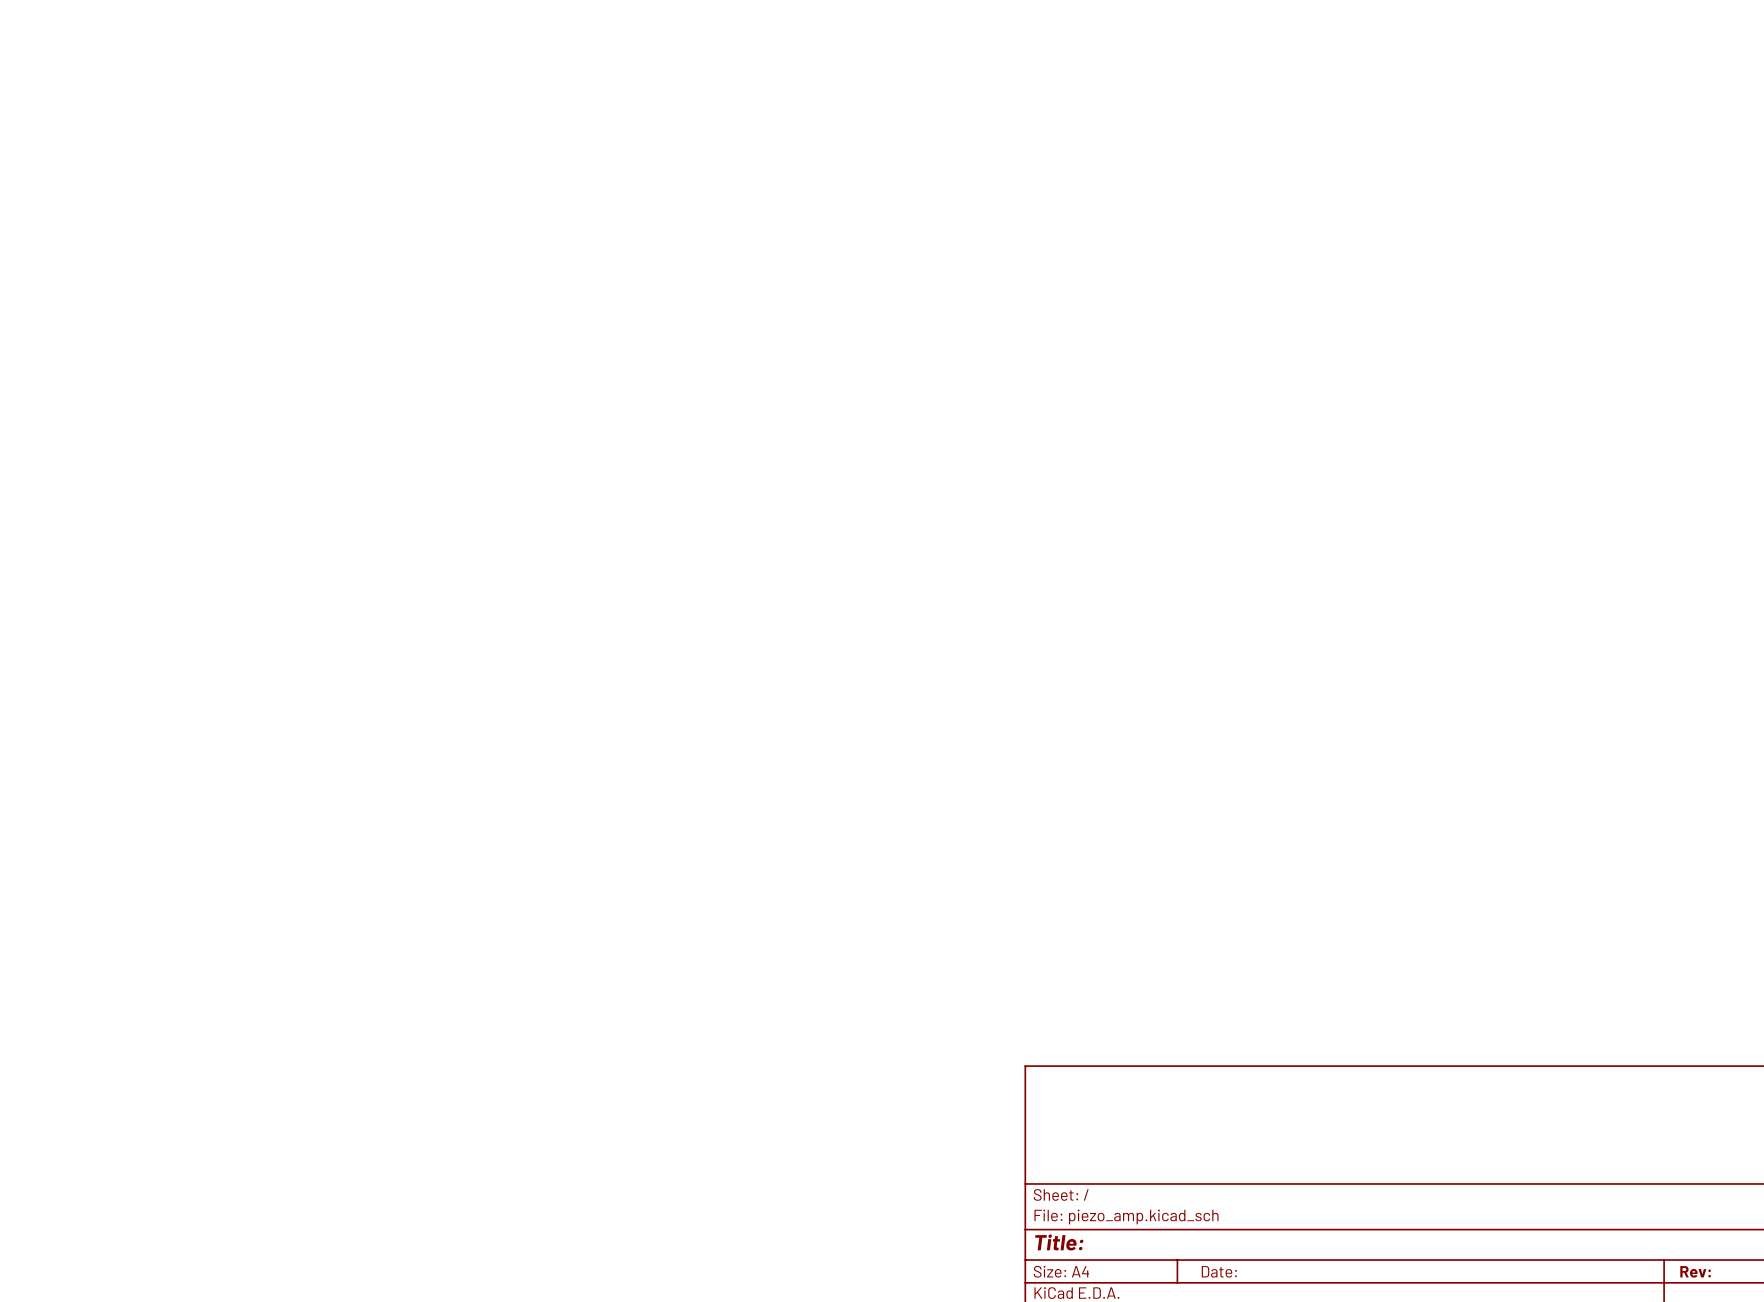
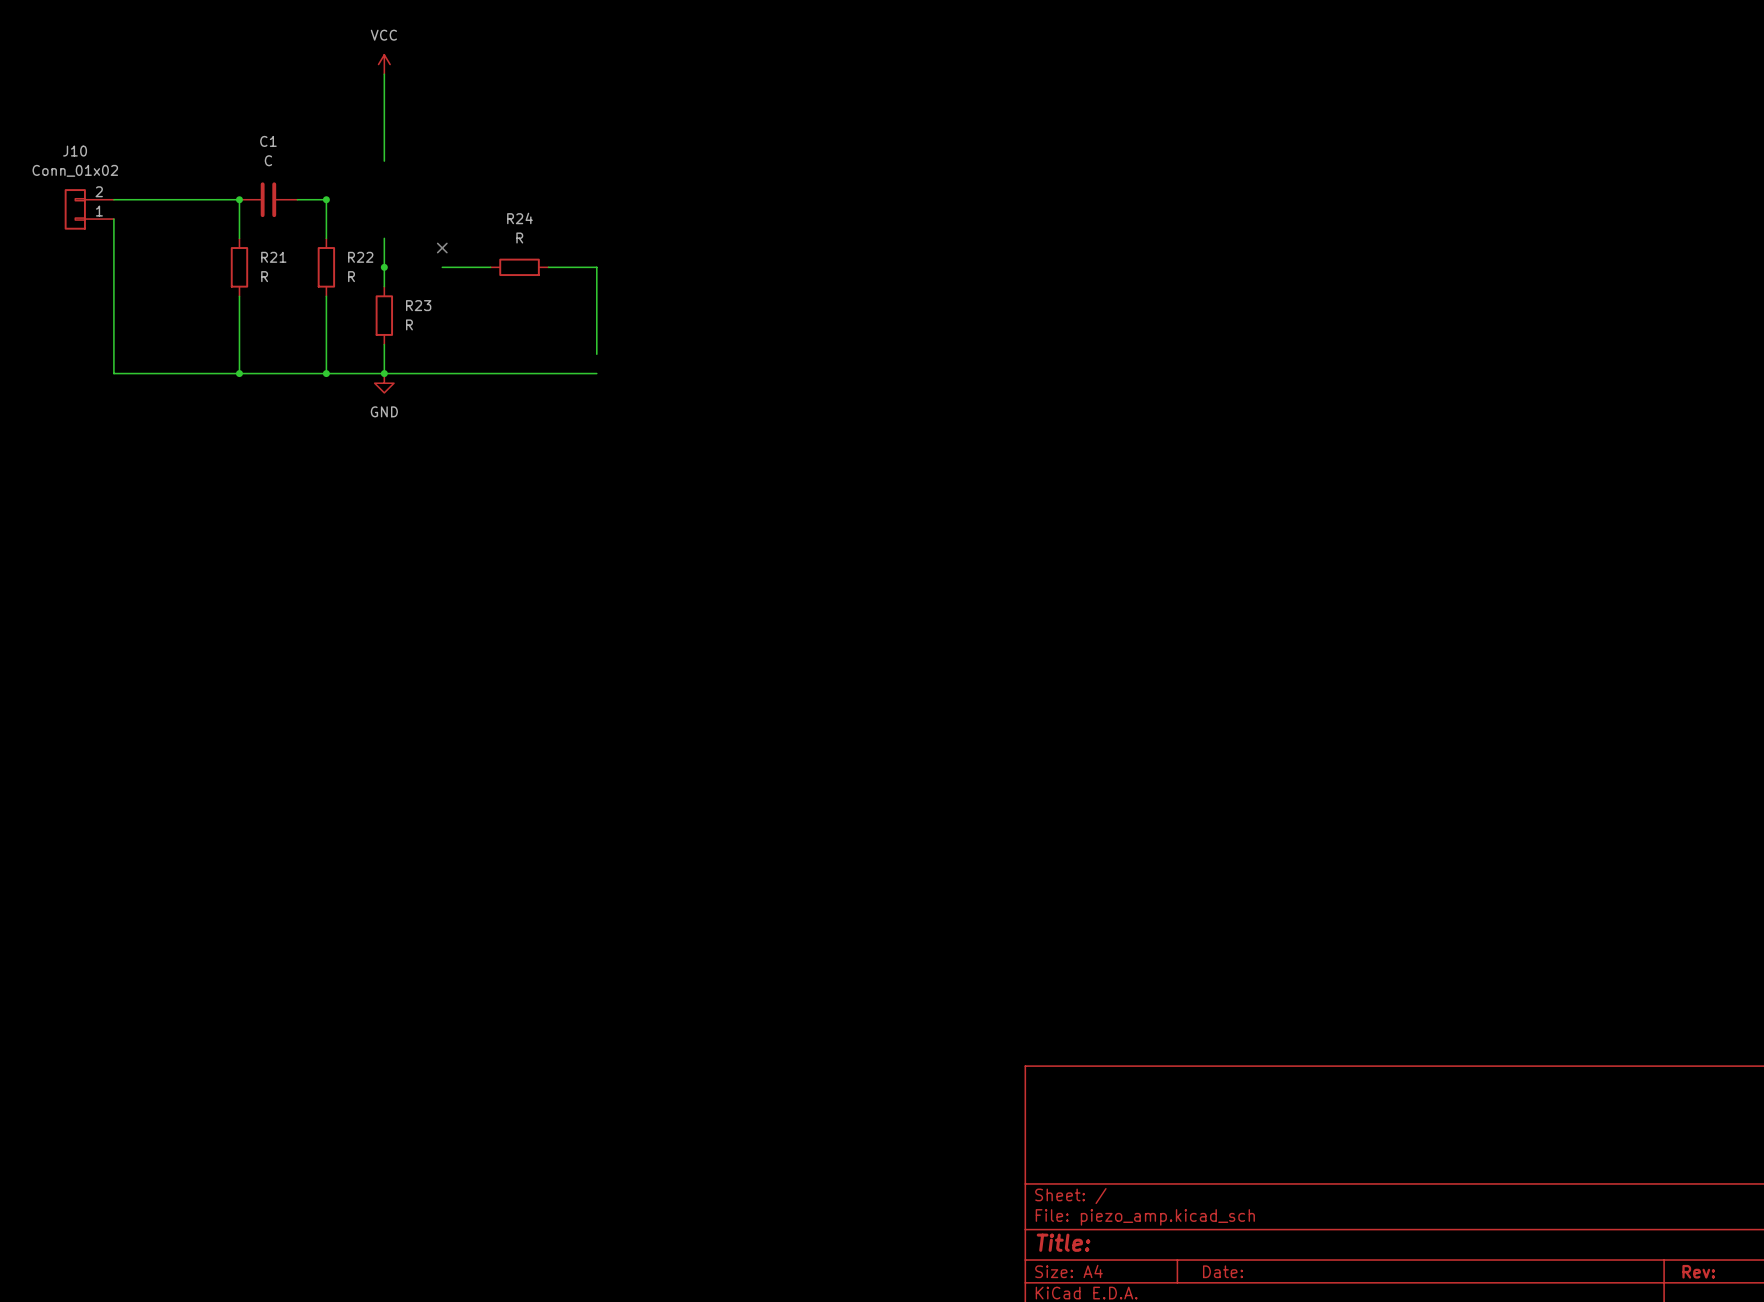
power symbol: none -> VCC (384, 64)
wire: none -> (384, 74) (384, 161)
wire: none -> (113, 199) (239, 199) (239, 238)
junction: none -> (239, 199)
C1: none -> C (268, 199)
wire: none -> (297, 199) (326, 199) (326, 238)
junction: none -> (326, 199)
J10: none -> Conn_01x02 (89, 209)
wire: none -> (113, 219) (113, 373) (596, 373)
wire: none -> (384, 238) (384, 286)
no-connect mark: none -> (442, 248)
R21: none -> R (239, 267)
R22: none -> R (326, 267)
junction: none -> (384, 267)
wire: none -> (442, 267) (490, 267)
R24: none -> R (519, 267)
wire: none -> (548, 267) (596, 267) (596, 354)
wire: none -> (239, 296) (239, 373)
wire: none -> (326, 296) (326, 373)
R23: none -> R (384, 315)
wire: none -> (384, 344) (384, 373)
junction: none -> (239, 373)
junction: none -> (326, 373)
junction: none -> (384, 373)
power symbol: none -> GND (384, 383)

